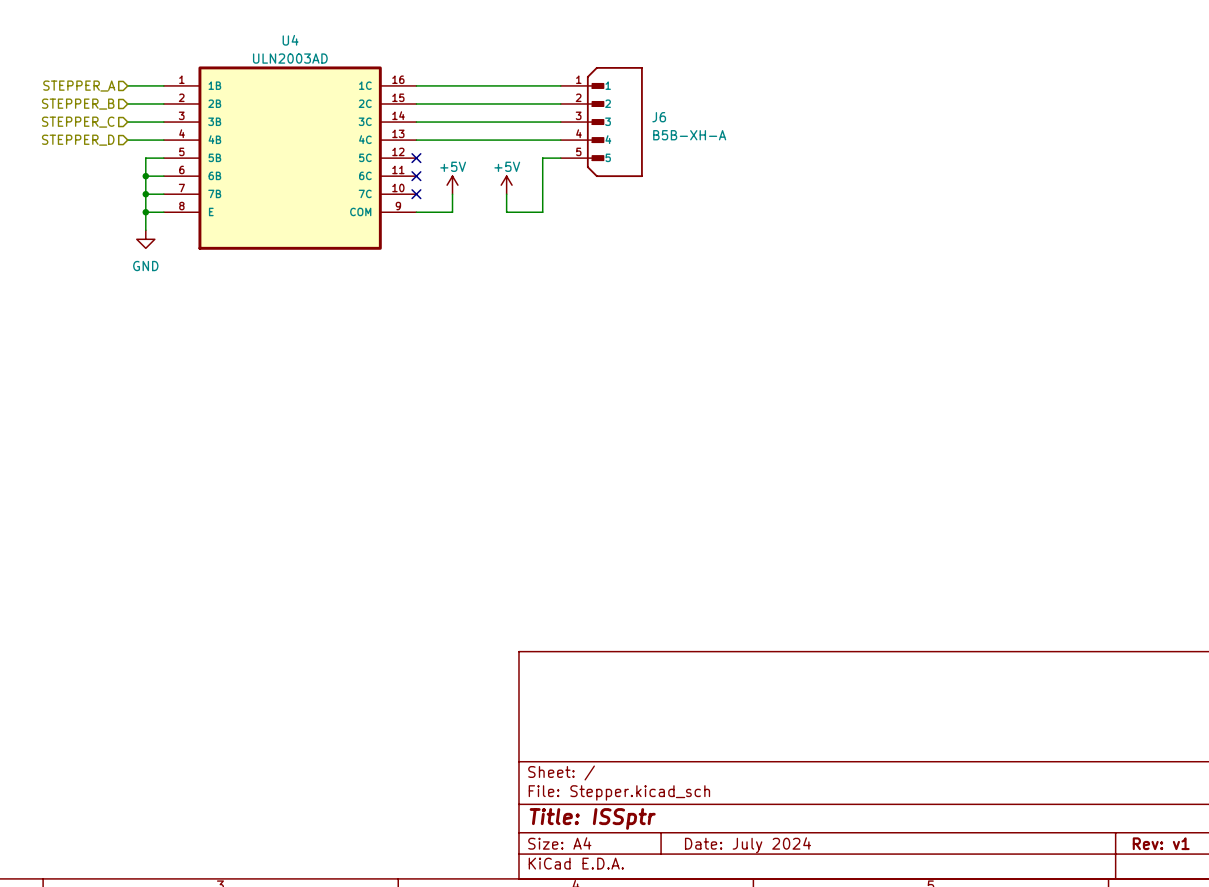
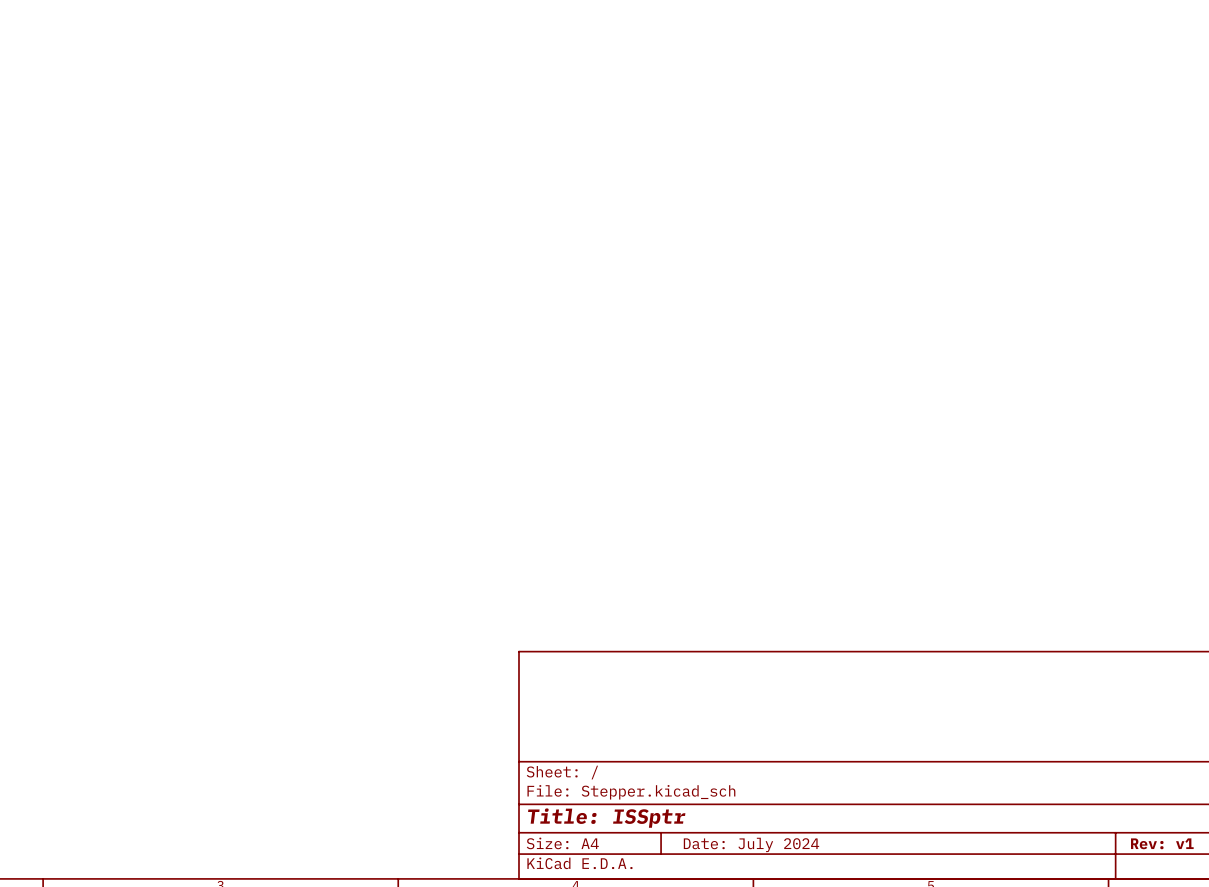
wire: (127, 85) (163, 85) -> none
wire: (416, 85) (560, 85) -> none
hierarchical label: STEPPER_A (79, 86) -> none
wire: (127, 103) (163, 103) -> none
wire: (416, 103) (560, 103) -> none
hierarchical label: STEPPER_B (78, 104) -> none
hierarchical label: STEPPER_C (78, 122) -> none
wire: (127, 122) (163, 122) -> none
wire: (416, 122) (560, 122) -> none
J6: B5B-XH-A (601, 122) -> none
hierarchical label: STEPPER_D (78, 140) -> none
wire: (127, 140) (163, 140) -> none
wire: (416, 140) (560, 140) -> none
wire: (163, 158) (145, 158) (145, 230) -> none
U4: ULN2003AD (290, 158) -> none
no-connect mark: (416, 158) -> none
wire: (560, 158) (542, 158) (542, 212) (506, 212) (506, 194) -> none
wire: (145, 176) (163, 176) -> none
junction: (145, 176) -> none
no-connect mark: (416, 176) -> none
power symbol: +5V (452, 185) -> none
power symbol: +5V (506, 185) -> none
wire: (145, 194) (163, 194) -> none
junction: (145, 194) -> none
no-connect mark: (416, 194) -> none
wire: (452, 194) (452, 212) (416, 212) -> none
wire: (145, 212) (163, 212) -> none
junction: (145, 212) -> none
power symbol: GND (145, 239) -> none

